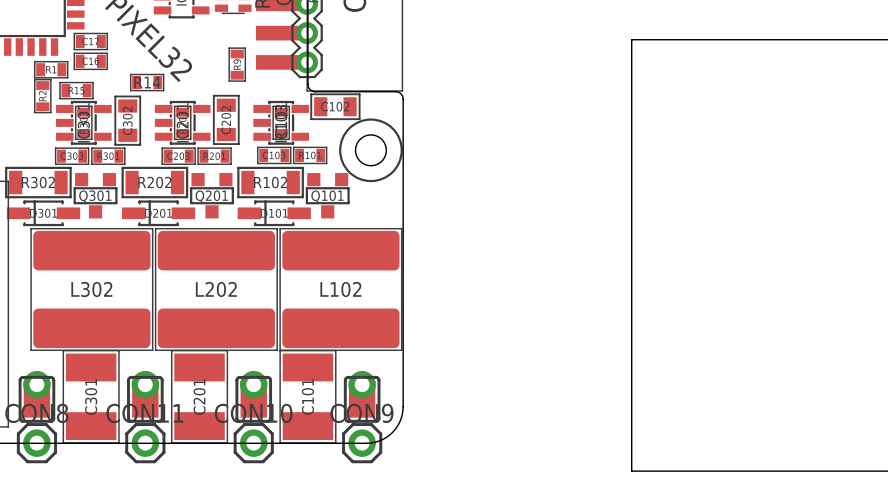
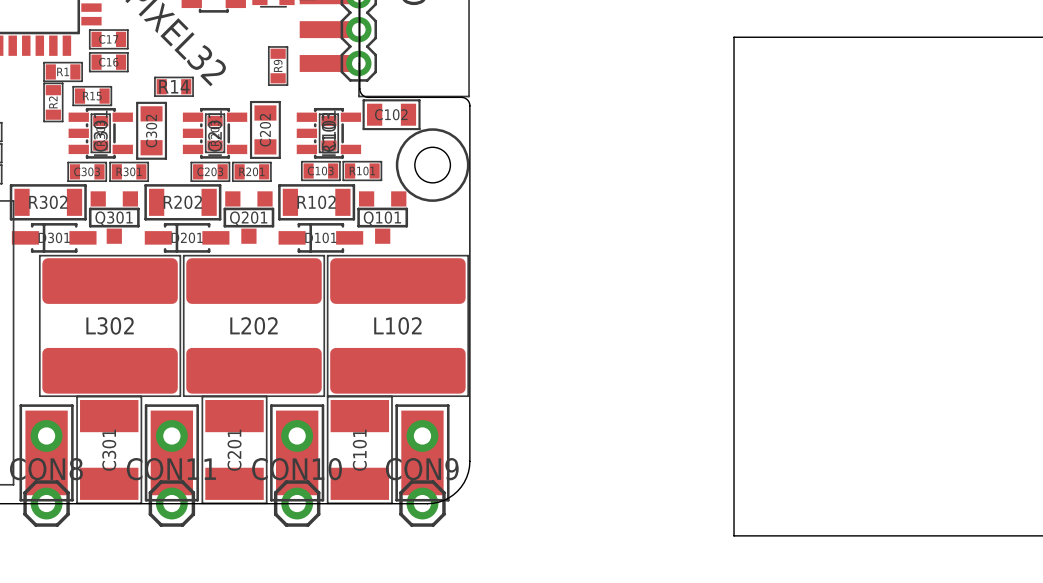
part footprint: [18, 375, 56, 423] -> [19, 404, 74, 502]
part footprint: [127, 375, 164, 423] -> [144, 404, 199, 502]
part footprint: [235, 375, 273, 423] -> [270, 404, 325, 502]
part footprint: [343, 375, 381, 423] -> [395, 404, 450, 502]

